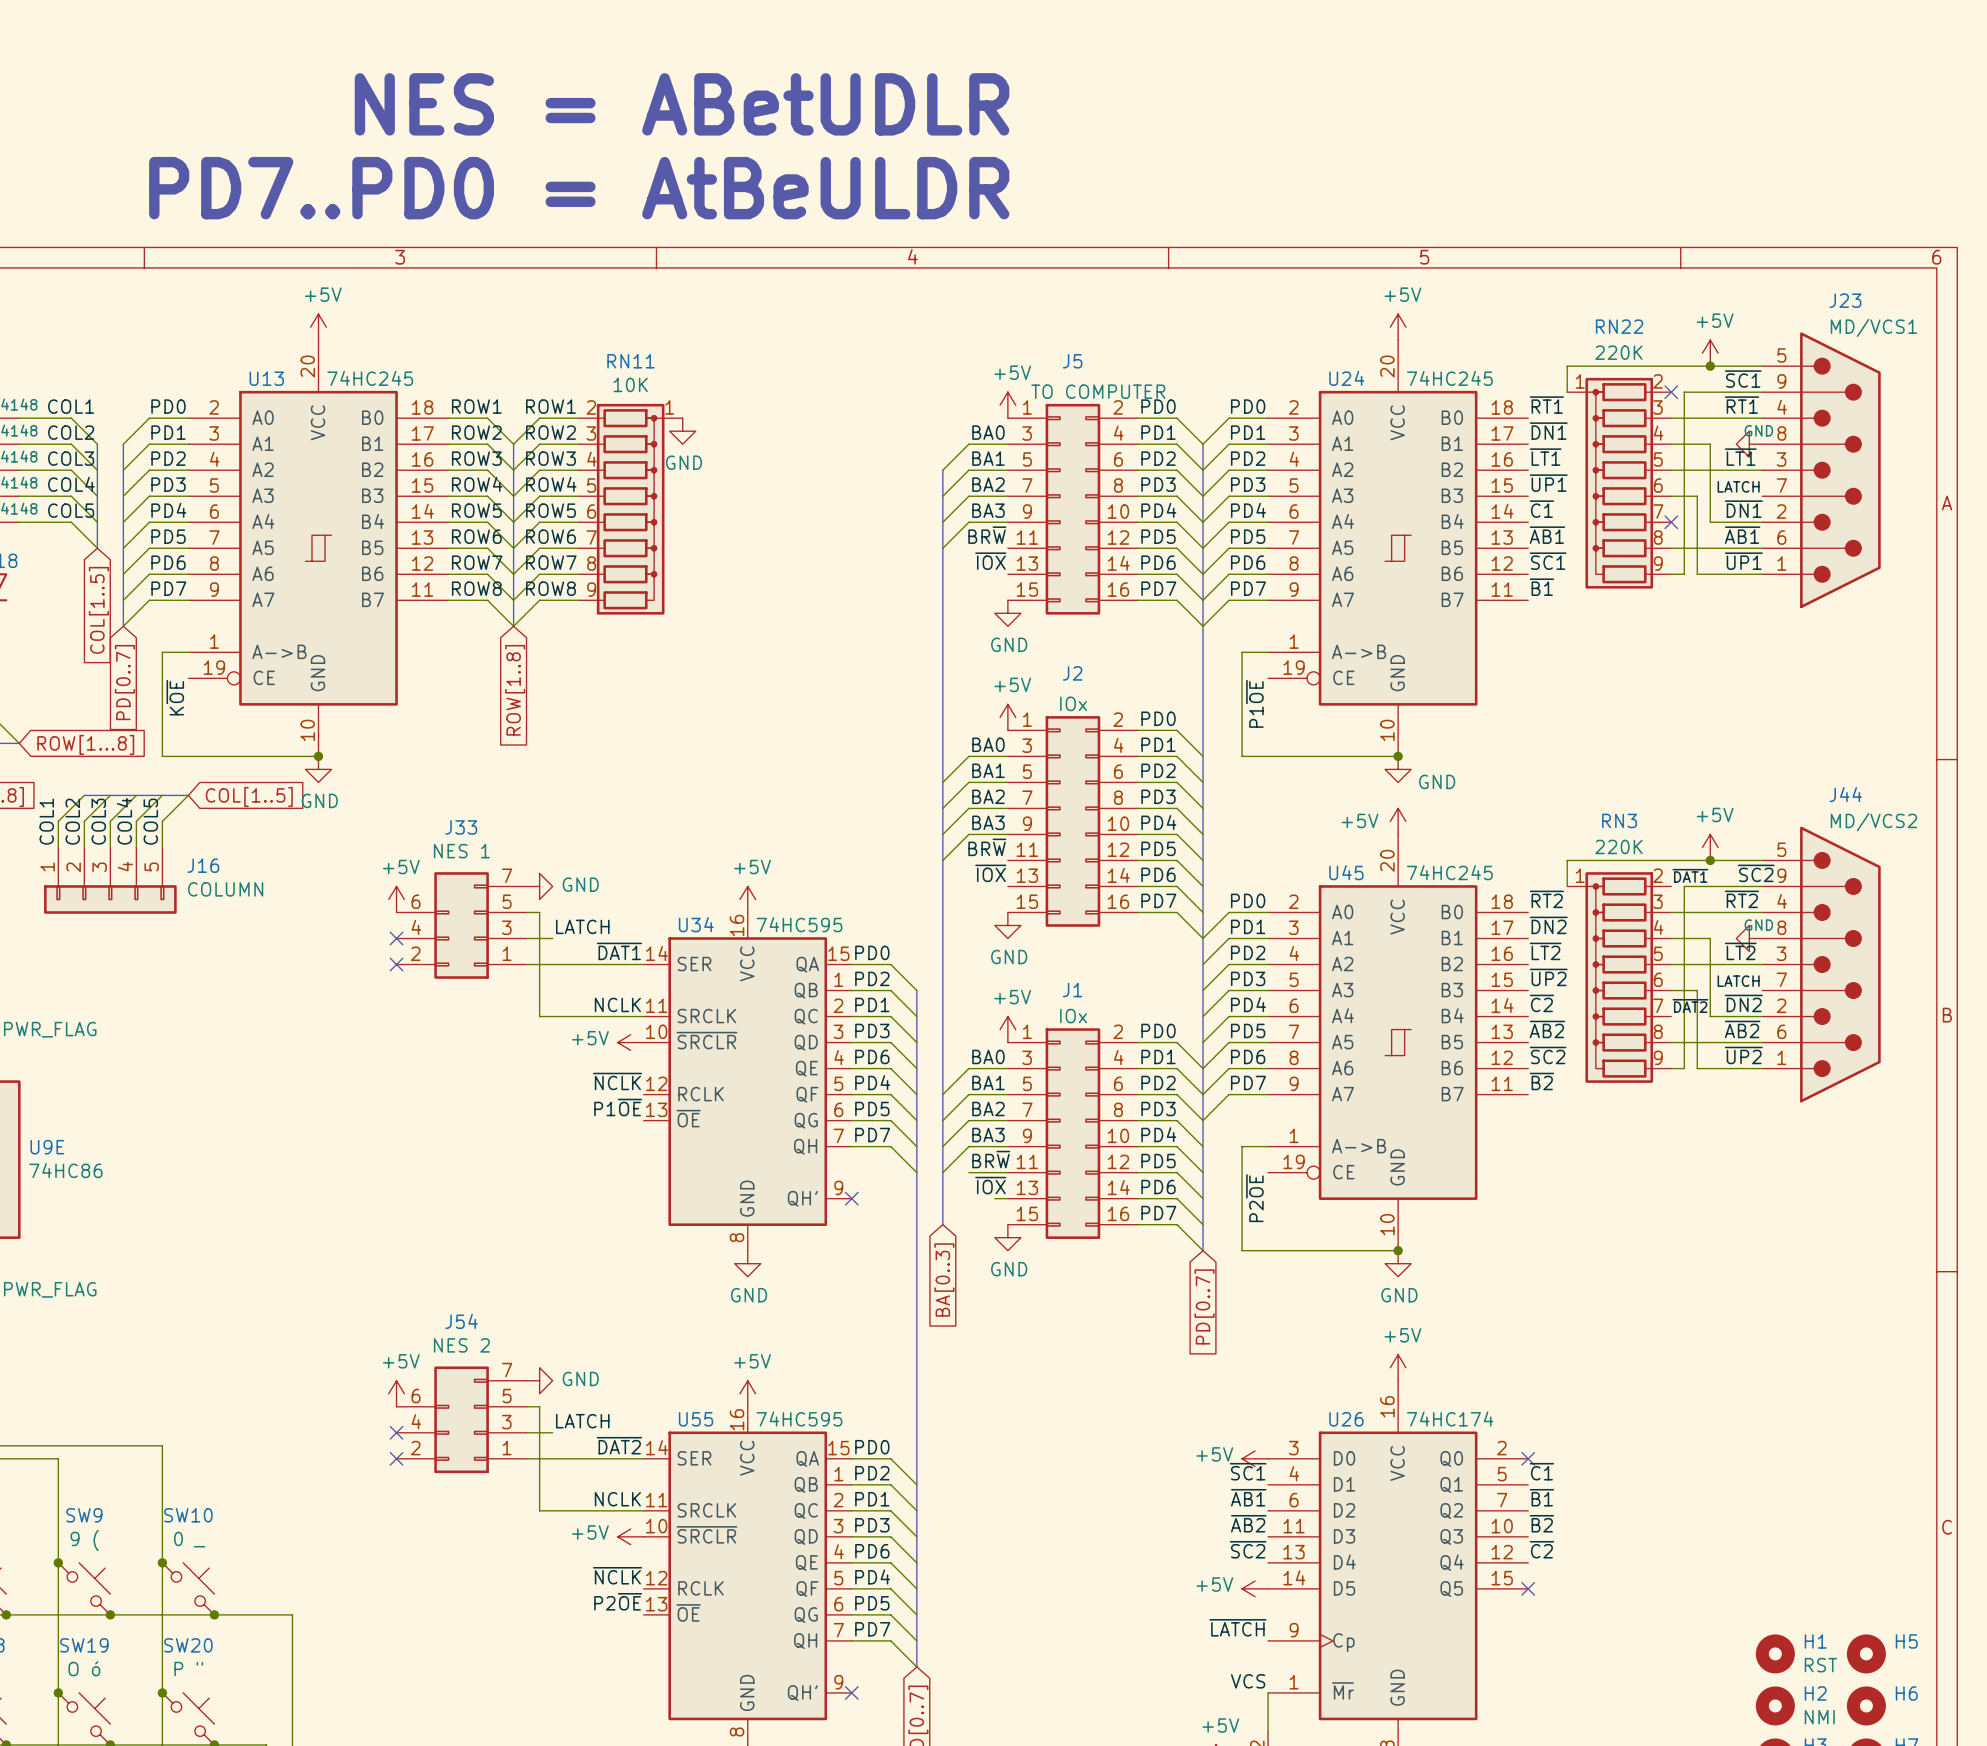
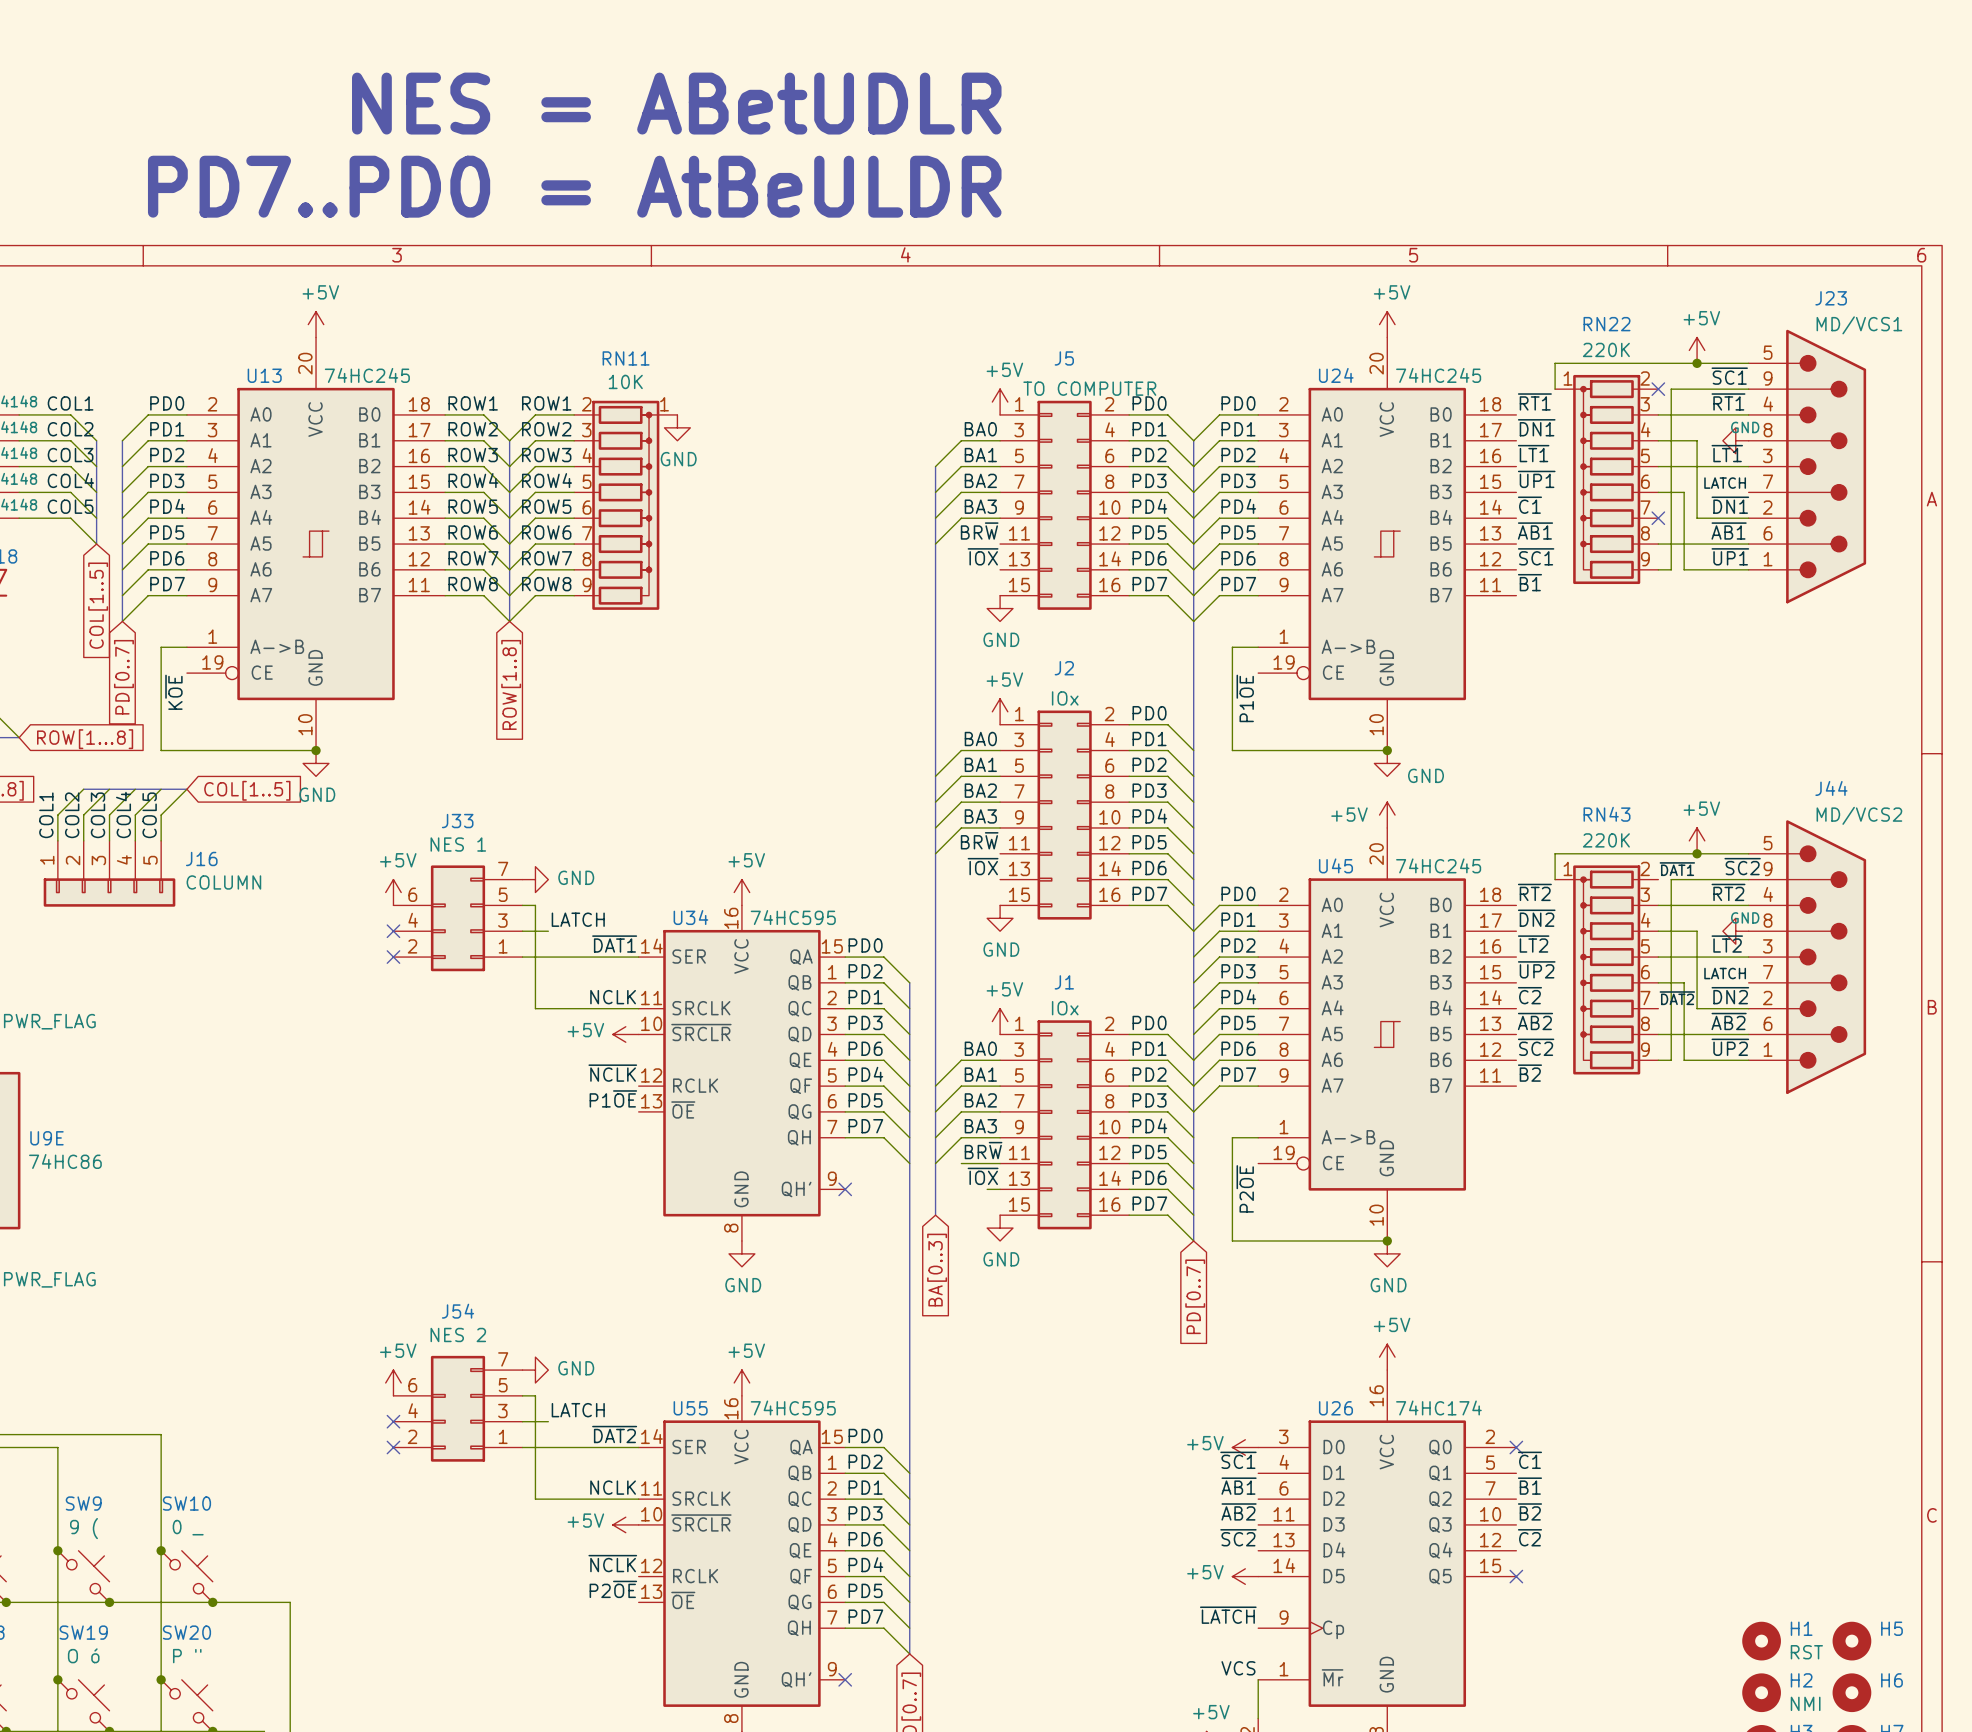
RN3 name: RN3 (1619, 820) -> RN43 (1607, 814)

